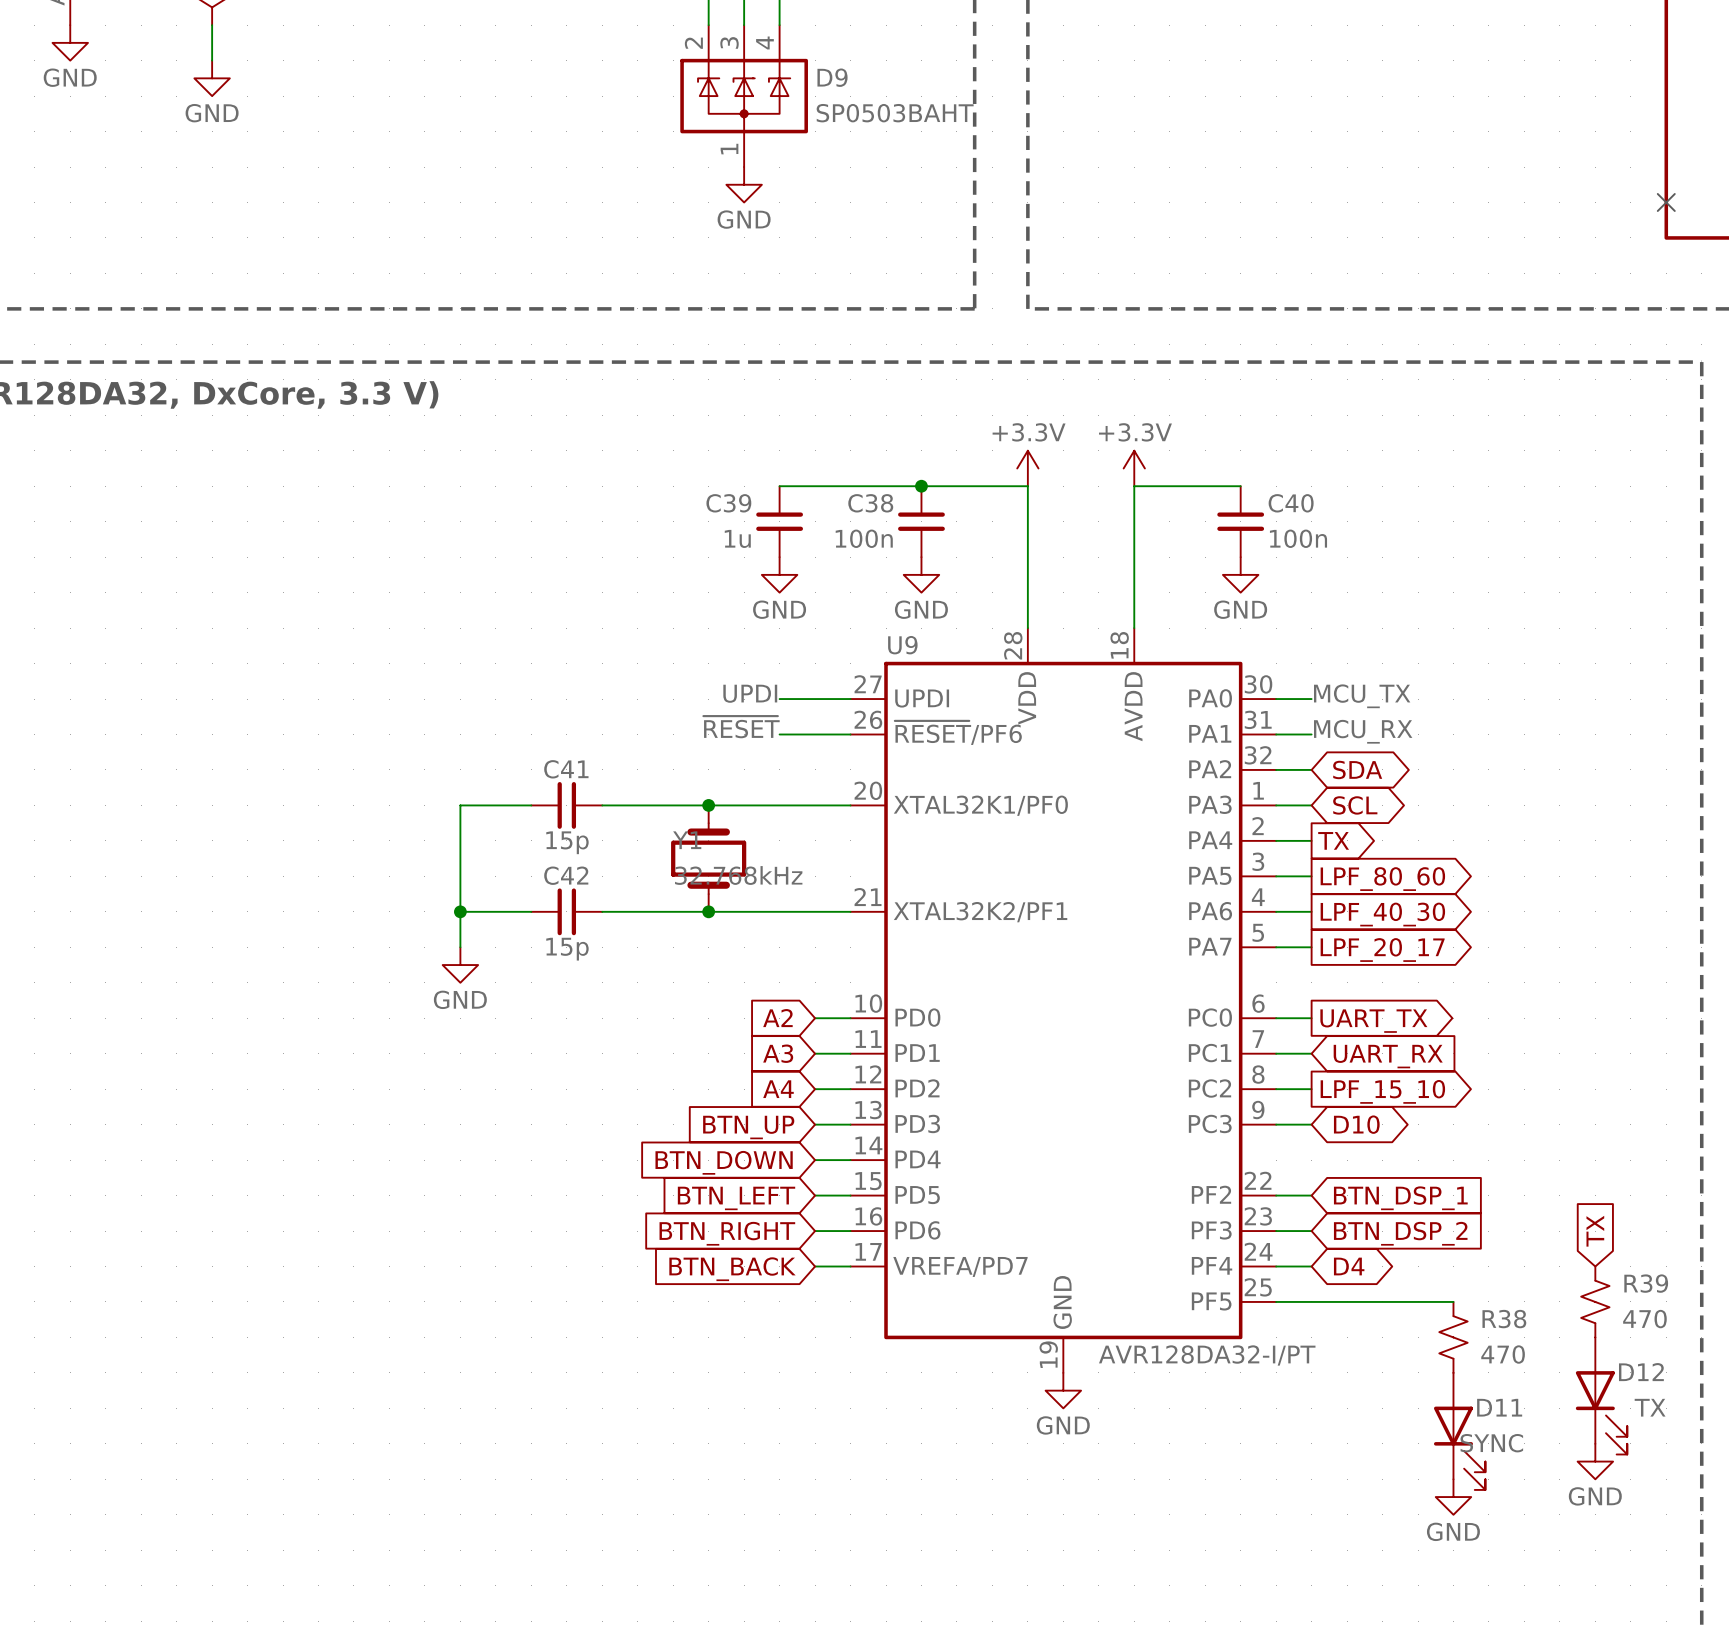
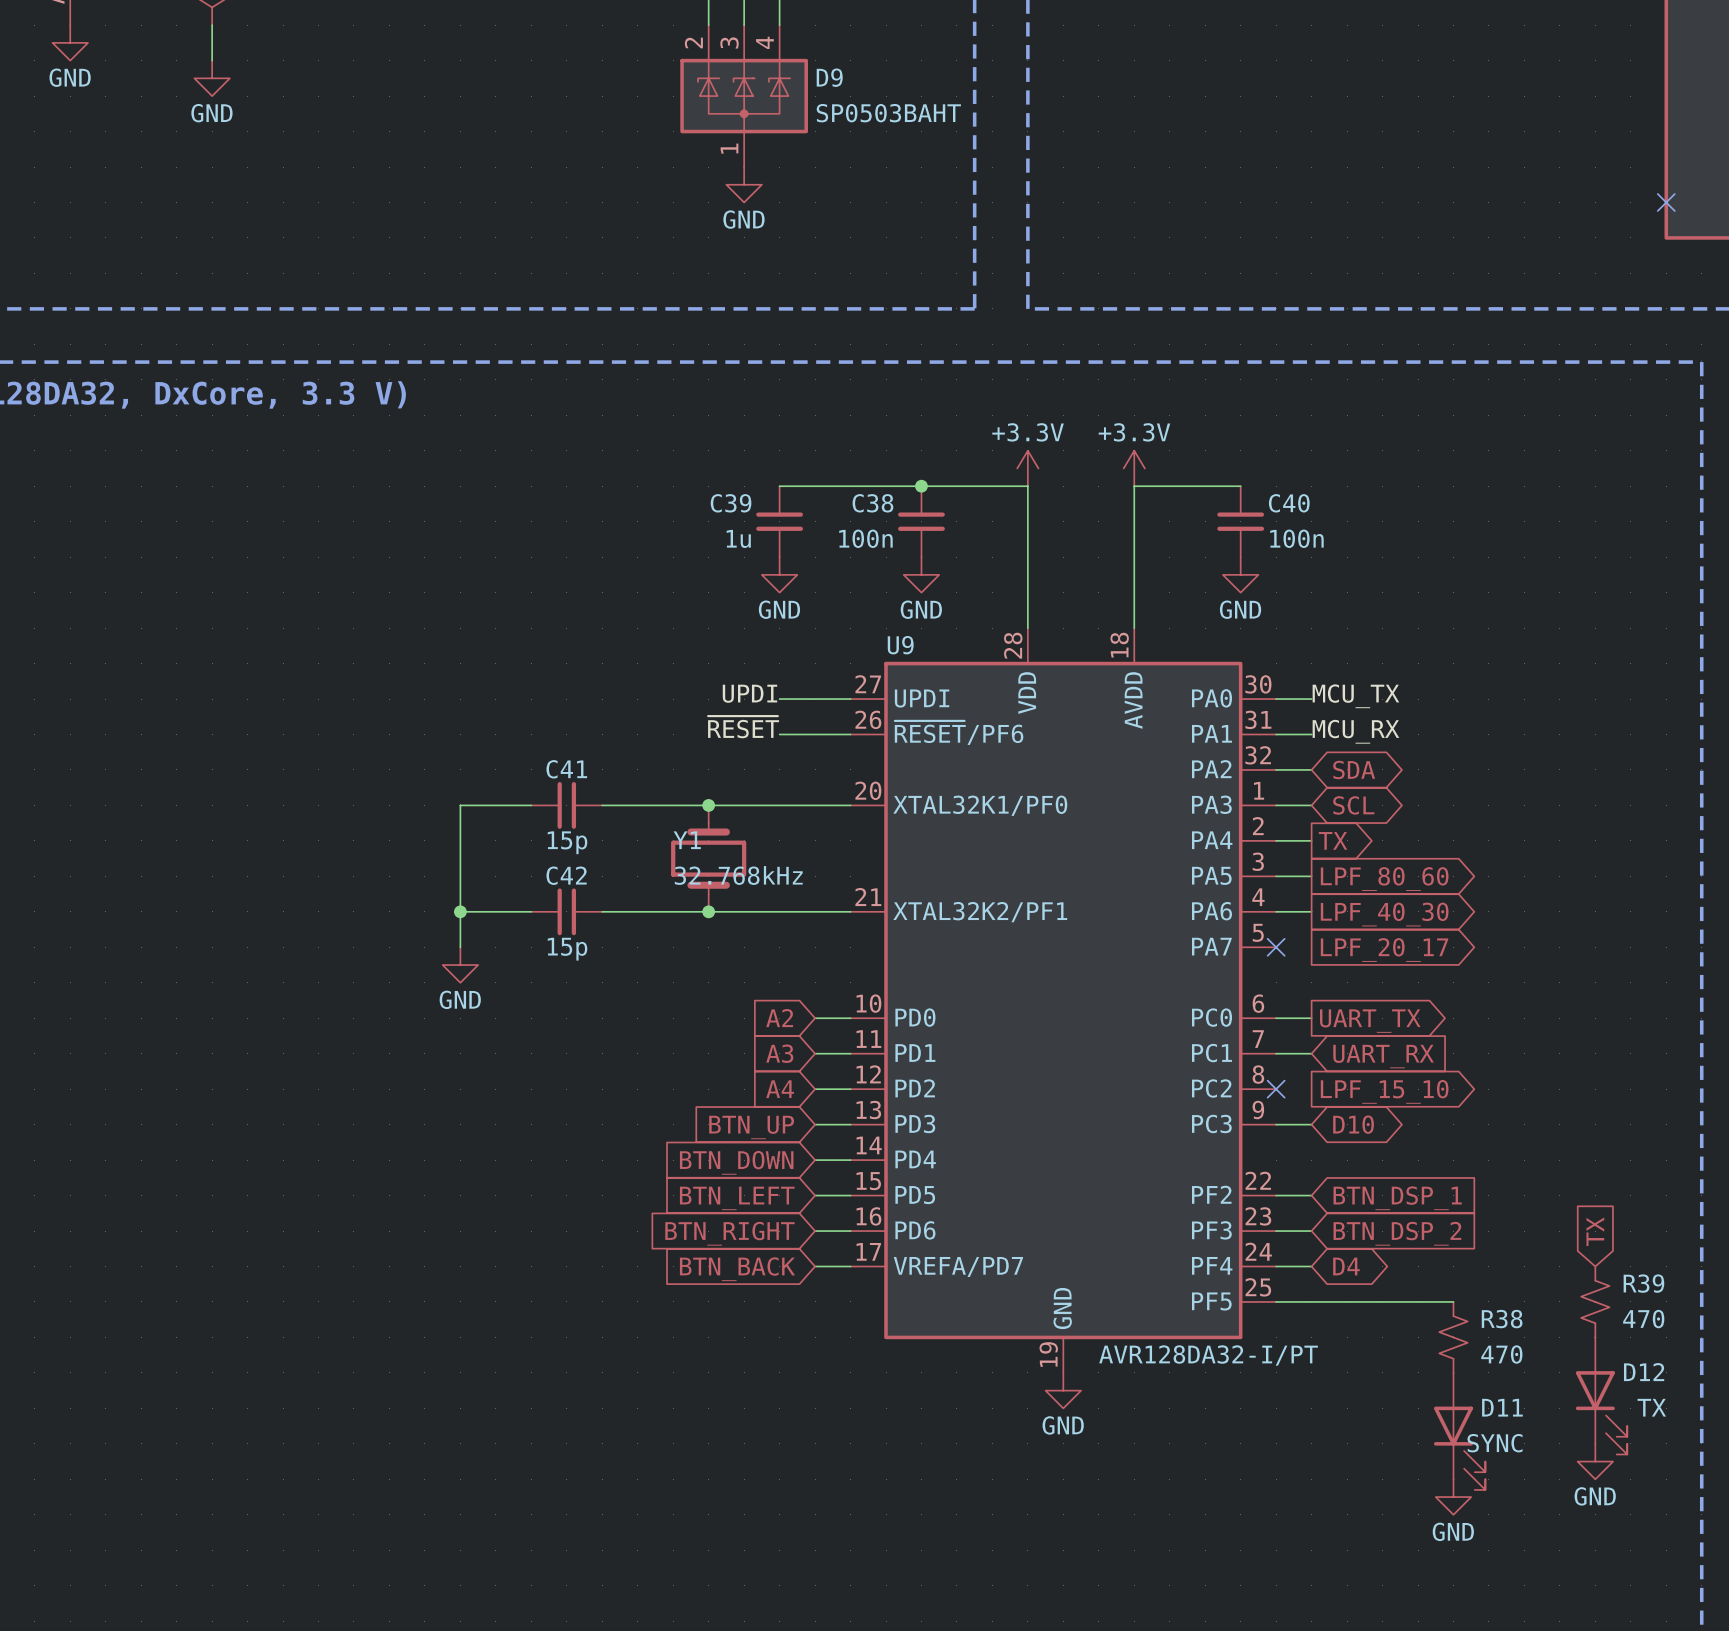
wire: (1276, 947) (1311, 947) -> none
no-connect mark: none -> (1276, 947)
wire: (1276, 1089) (1311, 1089) -> none
no-connect mark: none -> (1276, 1089)

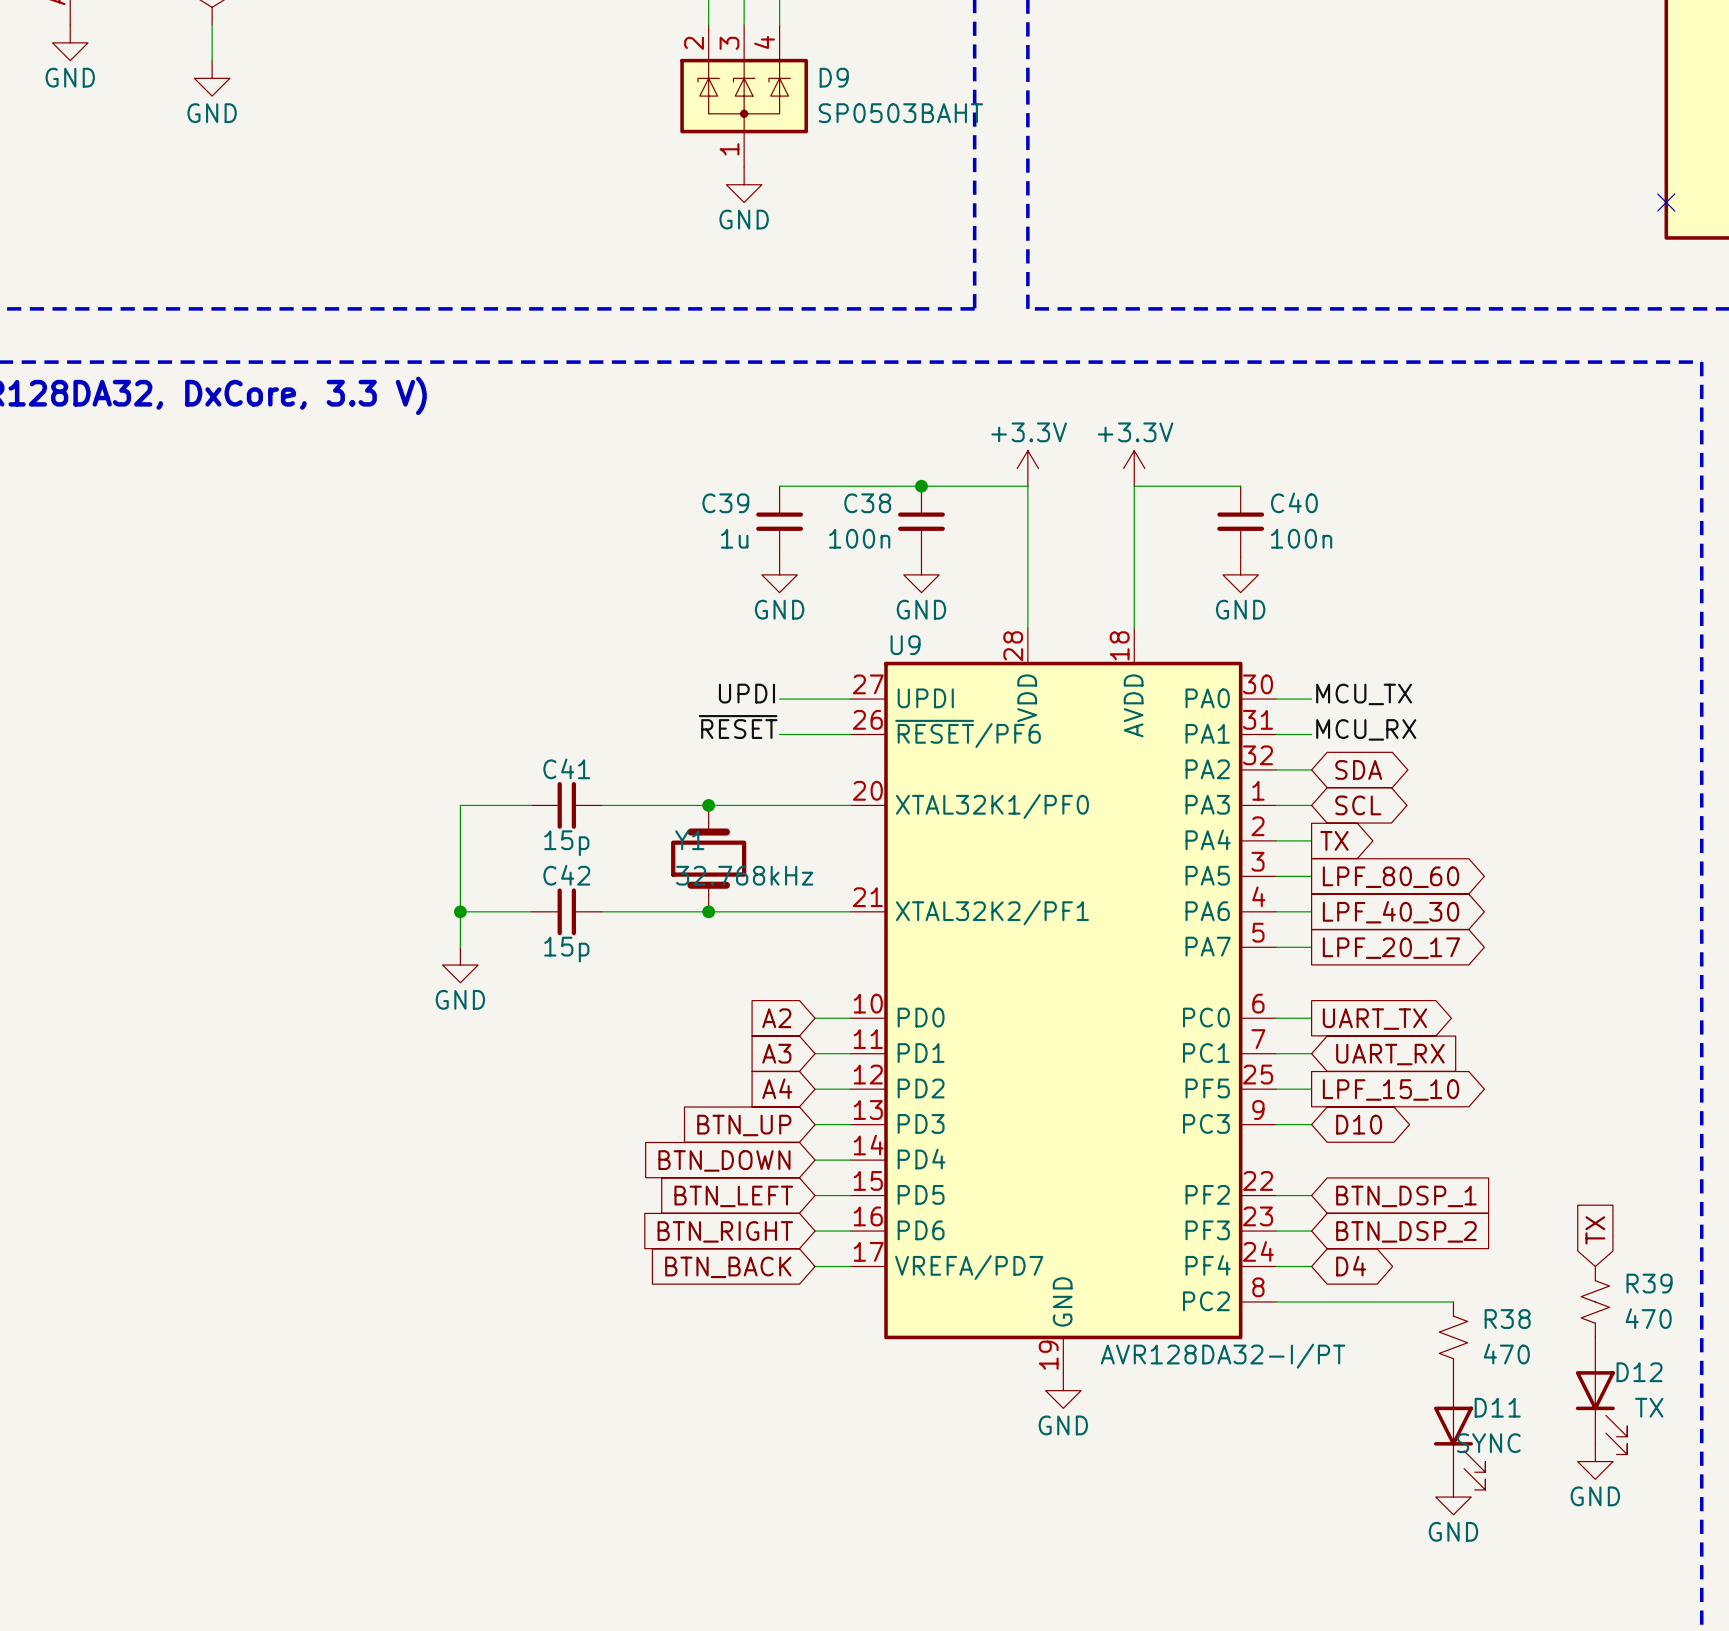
wire: none -> (1276, 947) (1311, 947)
no-connect mark: (1276, 947) -> none
U9 pin number: 8 (1258, 1074) -> 25 (1257, 1074)
U9 pin name: PC2 (1211, 1088) -> PF5 (1207, 1088)
wire: none -> (1276, 1089) (1311, 1089)
no-connect mark: (1276, 1089) -> none
U9 pin number: 25 (1258, 1287) -> 8 (1258, 1287)
U9 pin name: PF5 (1211, 1301) -> PC2 (1206, 1301)

